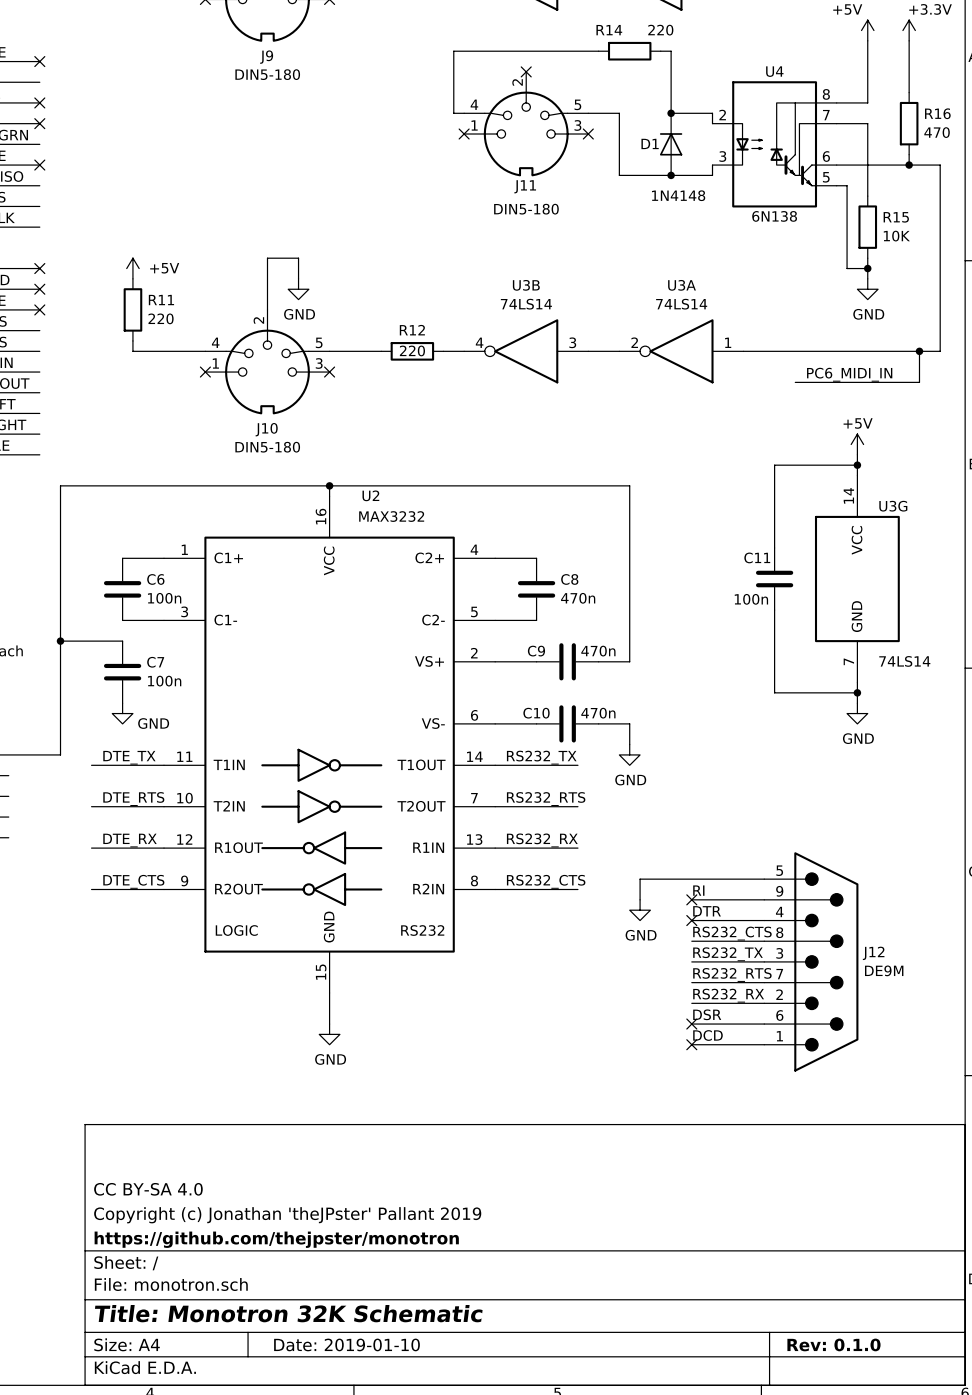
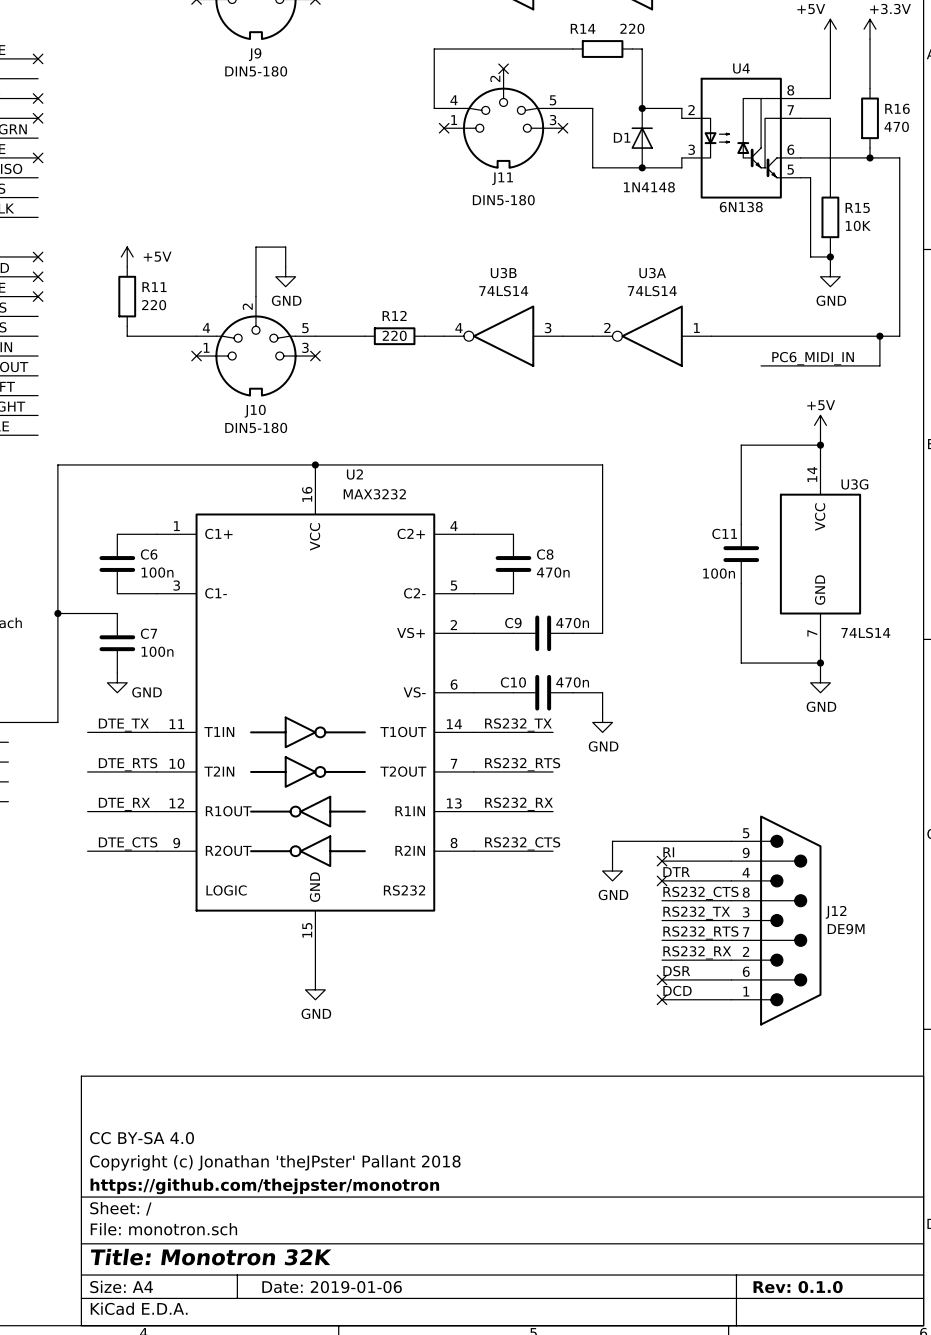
title block: Copyright (c) Jonathan 'theJPster' Pallant 2019 (287, 1215) -> Copyright (c) Jonathan 'theJPster' Pallant 2018 (275, 1162)
title block: Title: Monotron 32K Schematic (288, 1313) -> Title: Monotron 32K (211, 1257)
title block: Date: 2019-01-10 (346, 1344) -> Date: 2019-01-06 (332, 1287)

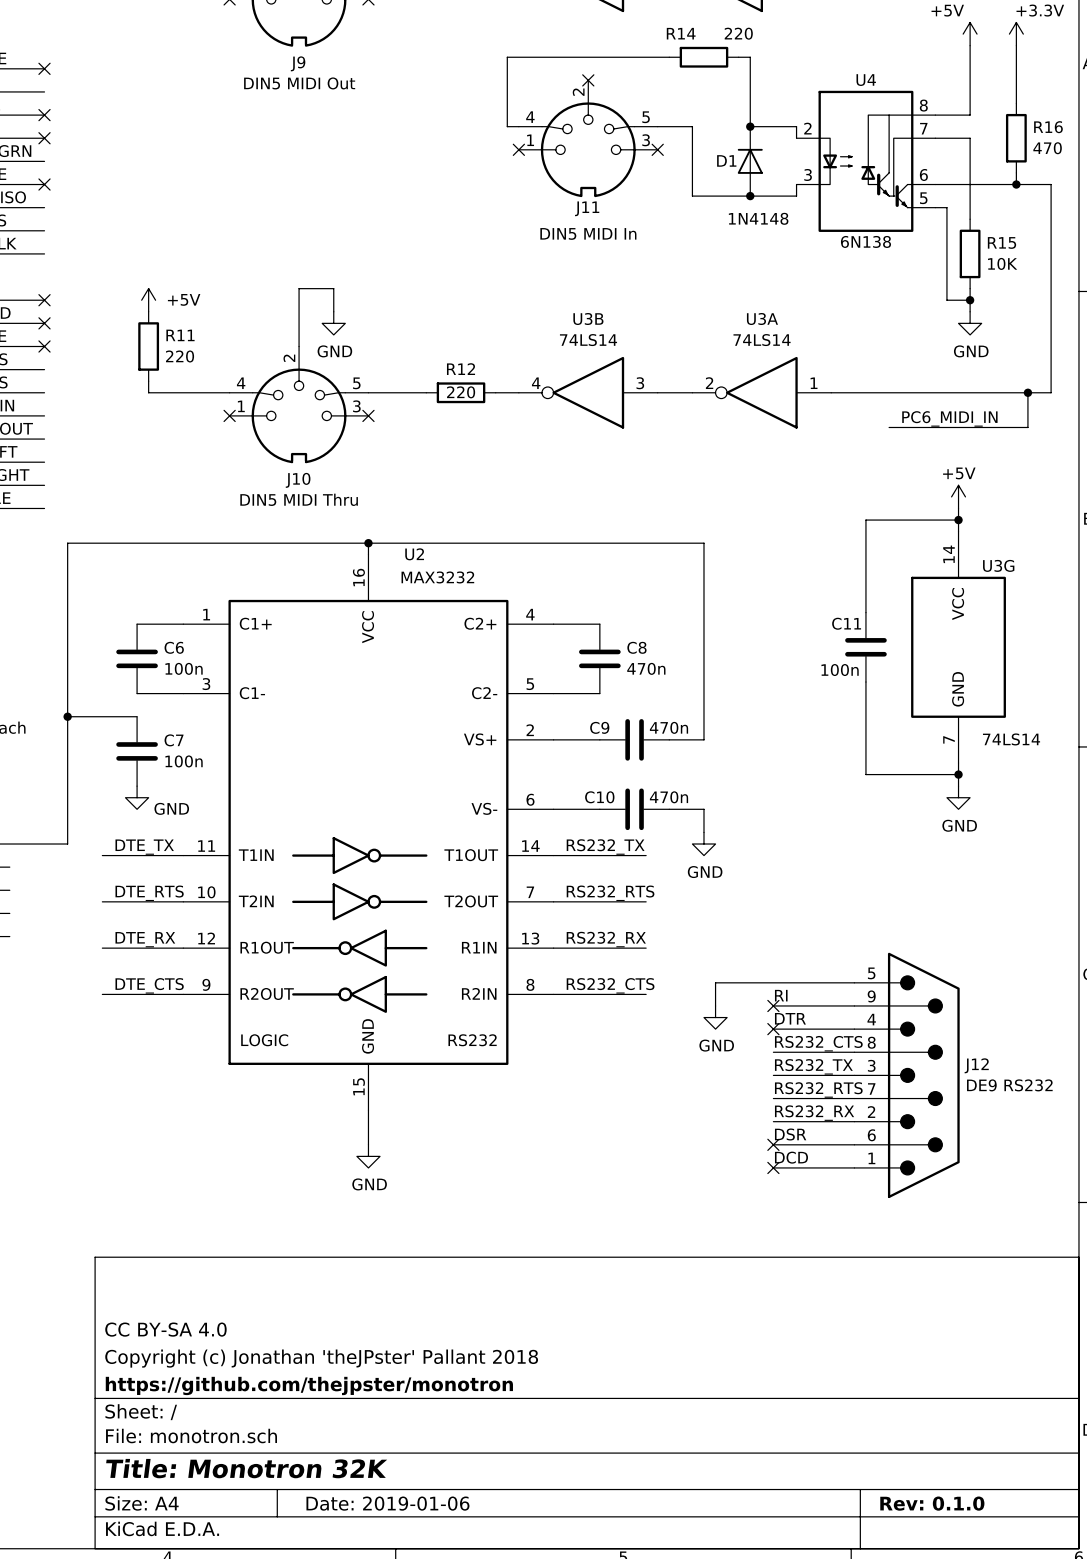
J9 value: DIN5-180 (256, 71) -> DIN5 MIDI Out (299, 83)
J11 value: DIN5-180 (503, 200) -> DIN5 MIDI In (588, 233)
J10 value: DIN5-180 (256, 427) -> DIN5 MIDI Thru (299, 499)
J12 value: DE9M (846, 929) -> DE9 RS232 (1009, 1085)

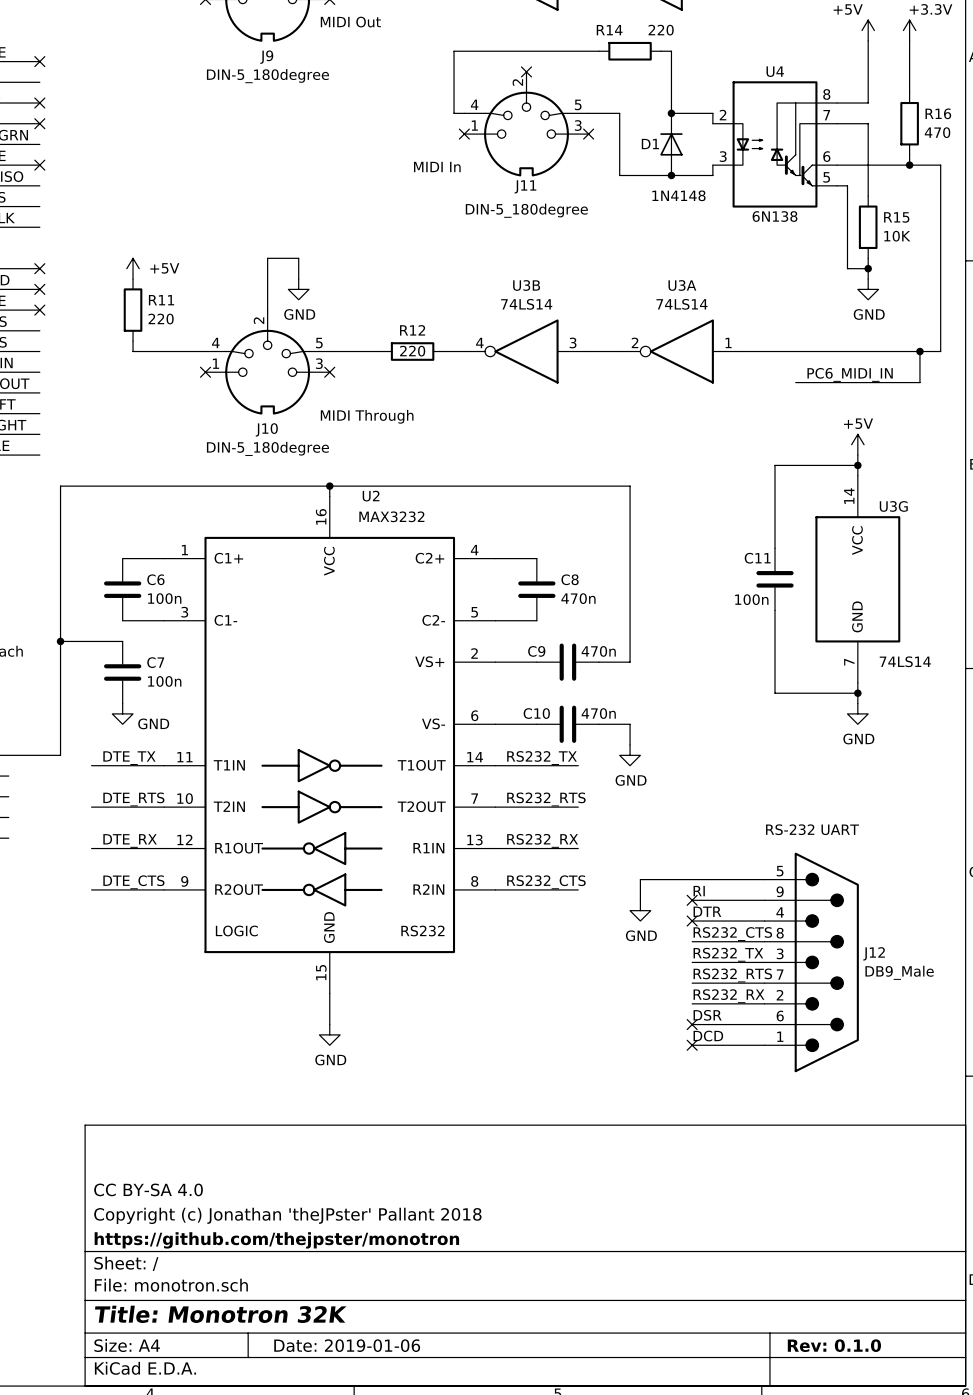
text: none -> MIDI Out (350, 22)
J9 value: DIN5 MIDI Out (299, 83) -> DIN-5_180degree (267, 76)
text: none -> MIDI In (437, 167)
J11 value: DIN5 MIDI In (588, 233) -> DIN-5_180degree (526, 210)
text: none -> MIDI Through (367, 416)
J10 value: DIN5 MIDI Thru (299, 499) -> DIN-5_180degree (267, 448)
text: none -> RS-232 UART (812, 829)
J12 value: DE9 RS232 (1009, 1085) -> DB9_Male (899, 972)

